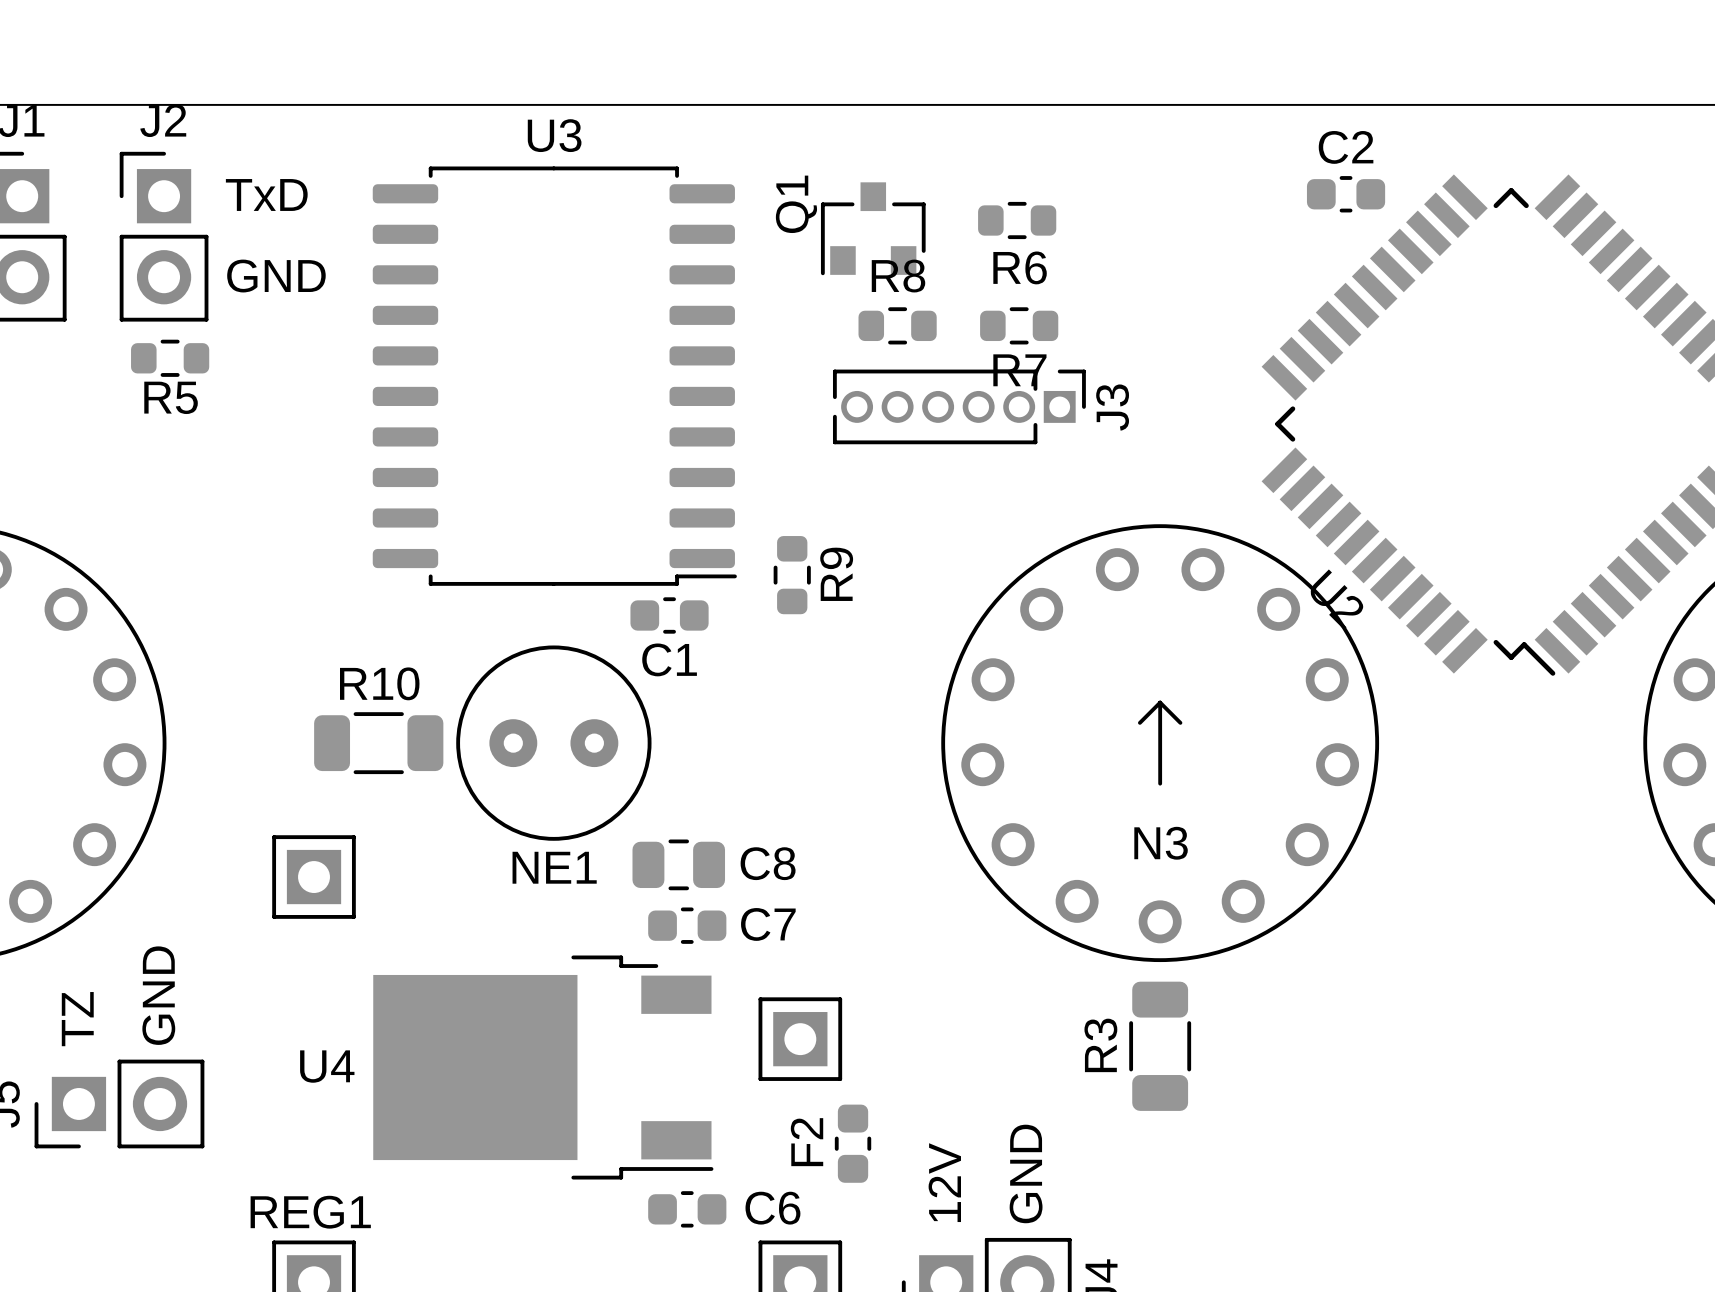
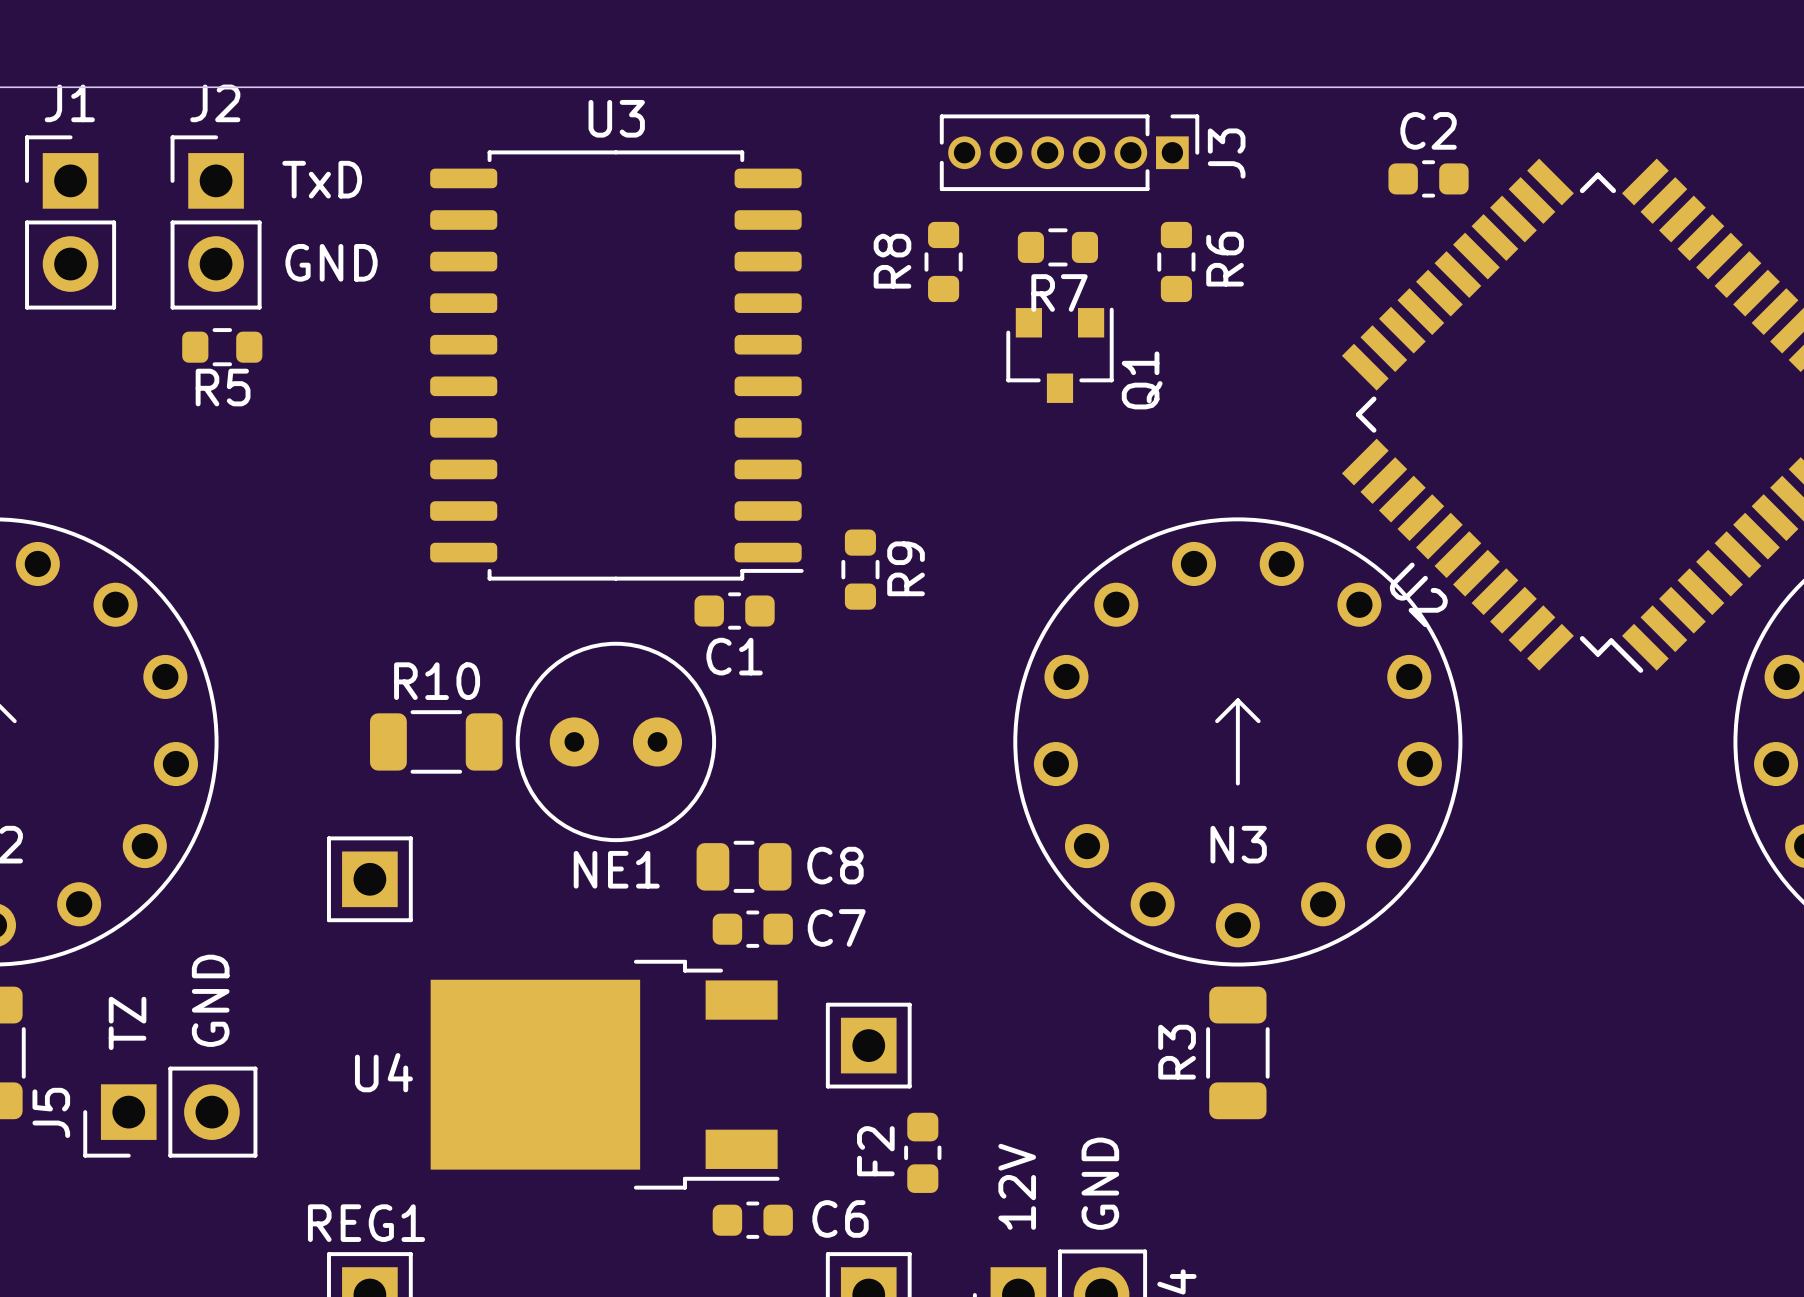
R6 rotation: 0° (1017, 220) -> 90° clockwise (1176, 261)
R6 position: (1017, 220) -> (1176, 261)
Q1 rotation: 0° (873, 228) -> 180° (1059, 355)
Q1 position: (873, 228) -> (1059, 355)
R6 name position: R6 (1020, 267) -> R6 (1225, 259)
R8 name position: R8 (898, 276) -> R8 (892, 261)
R8 rotation: 0° (897, 325) -> 90° clockwise (943, 261)
R8 position: (897, 325) -> (943, 261)
R7 position: (1019, 325) -> (1057, 247)
J3 position: (959, 406) -> (1069, 152)

